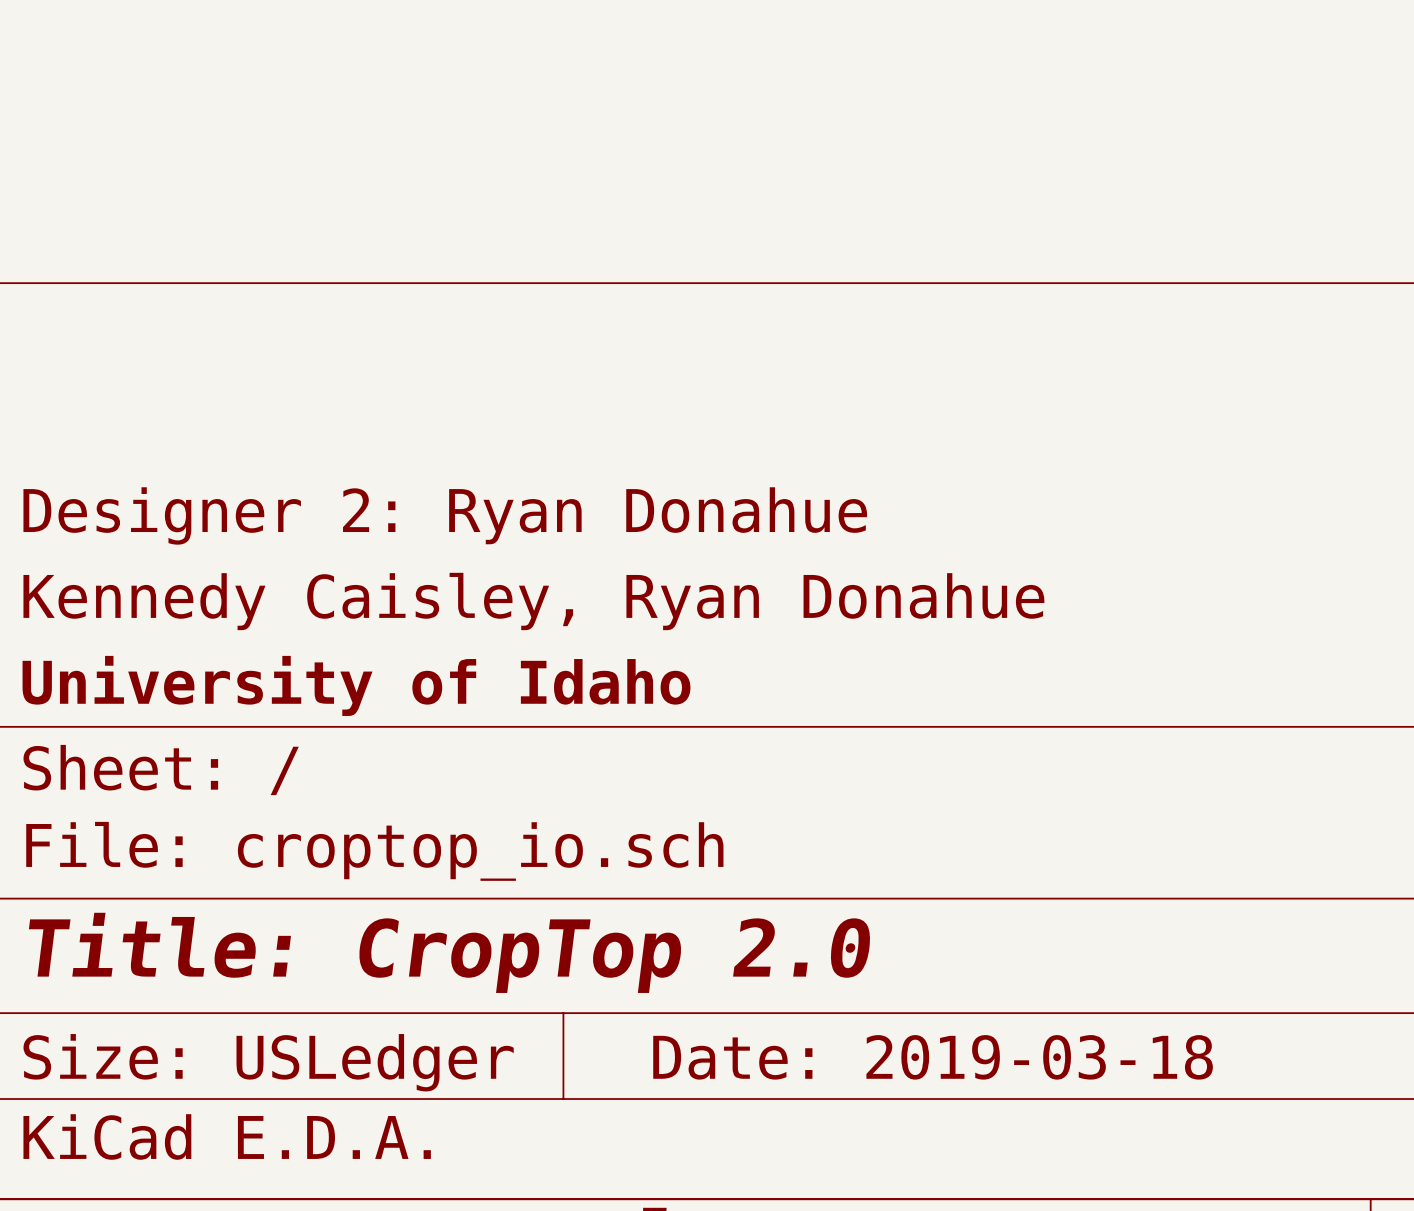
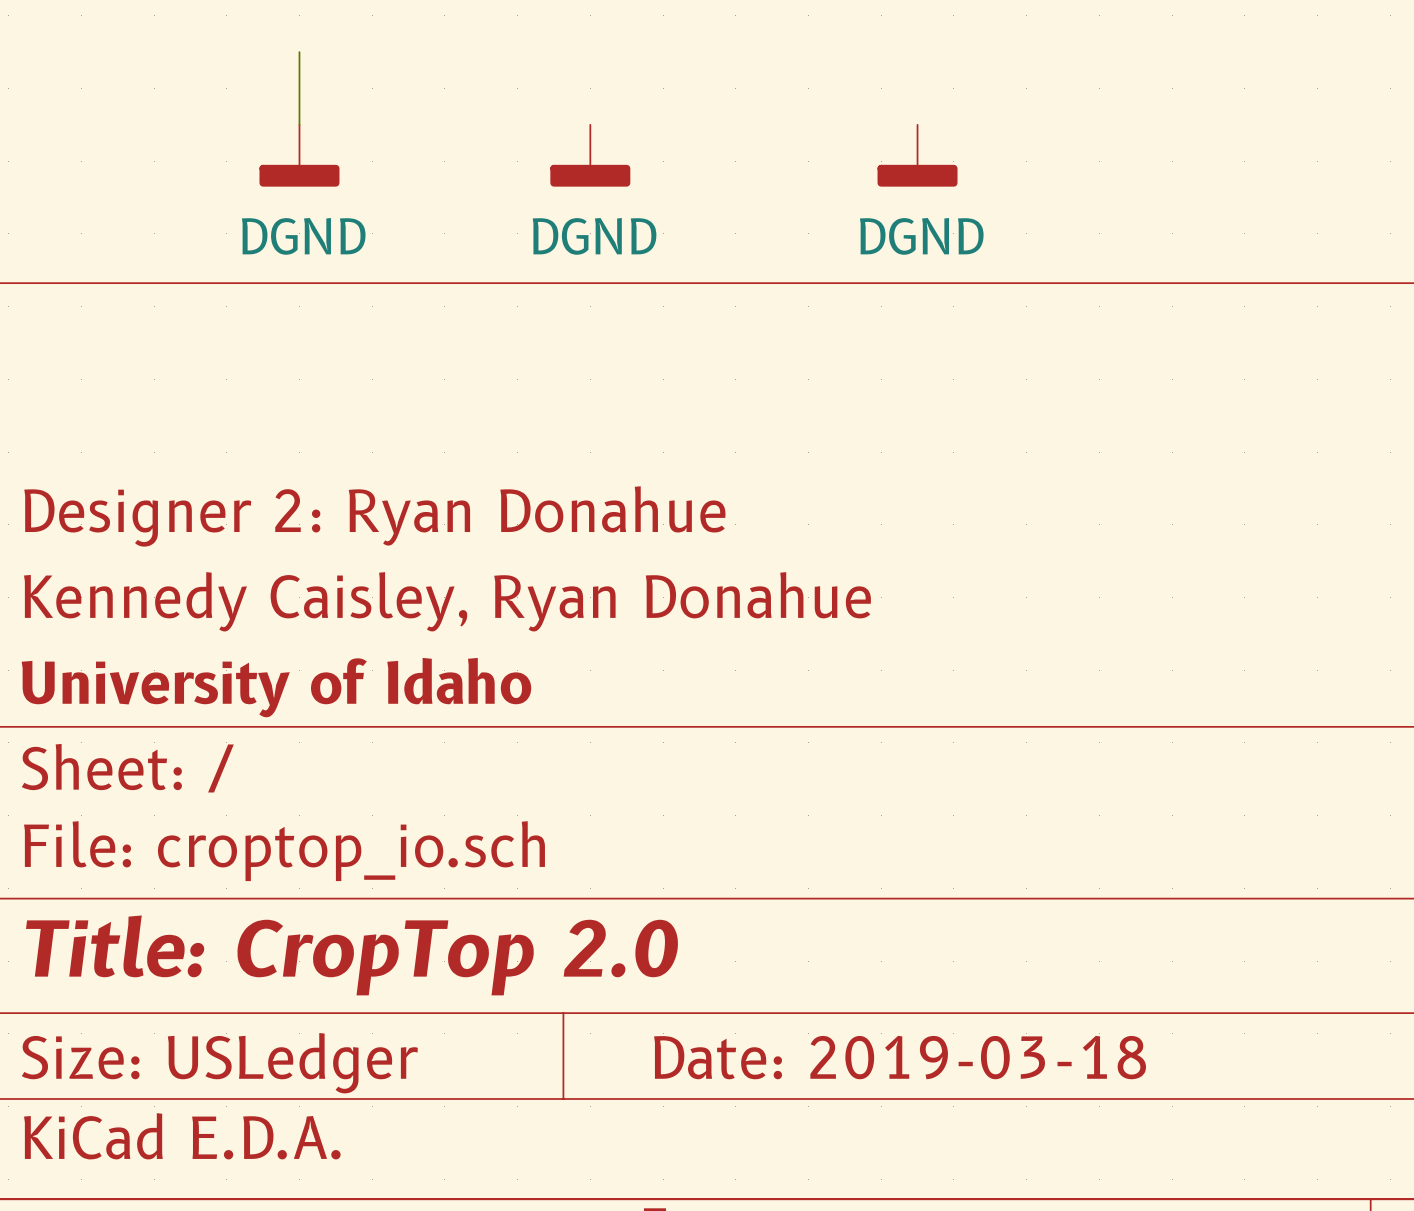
wire: none -> (299, 52) (299, 124)
power symbol: none -> DGND (299, 155)
power symbol: none -> DGND (590, 155)
power symbol: none -> DGND (917, 155)

